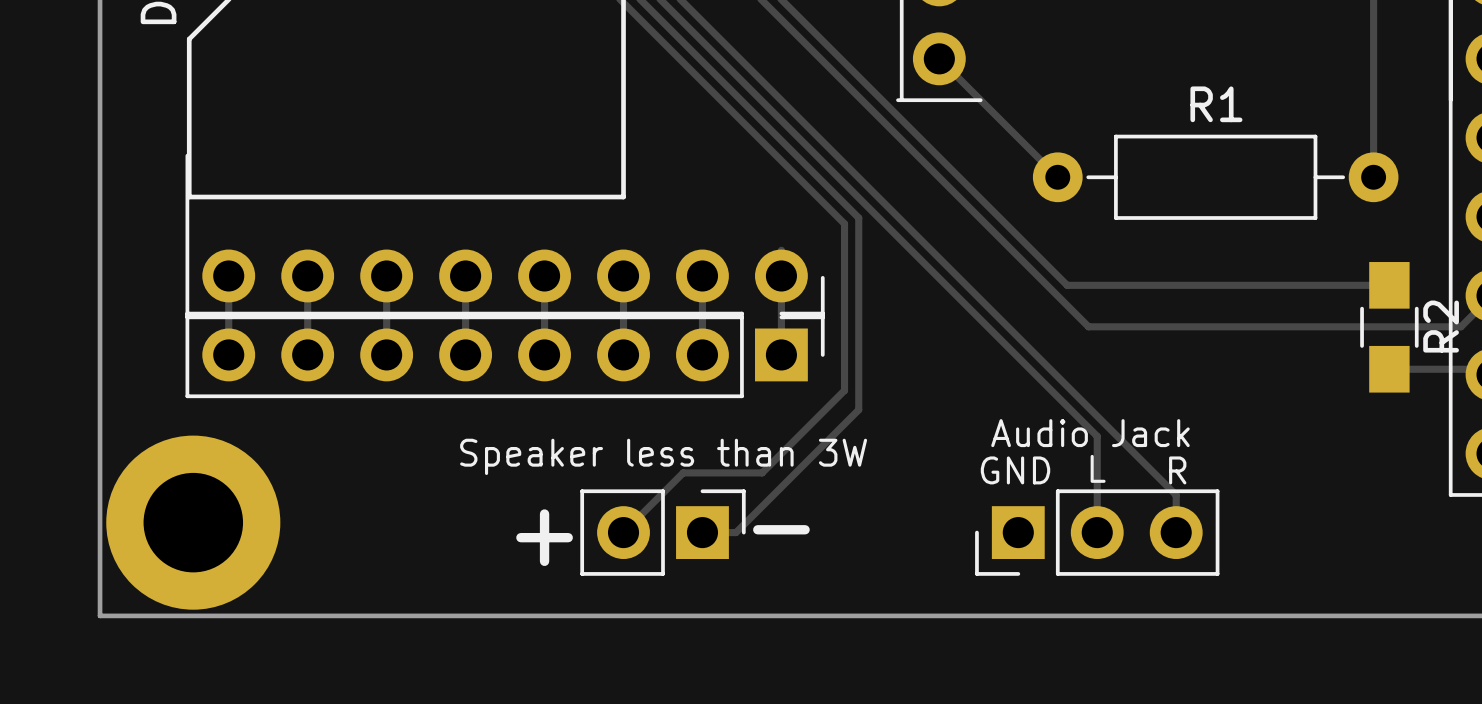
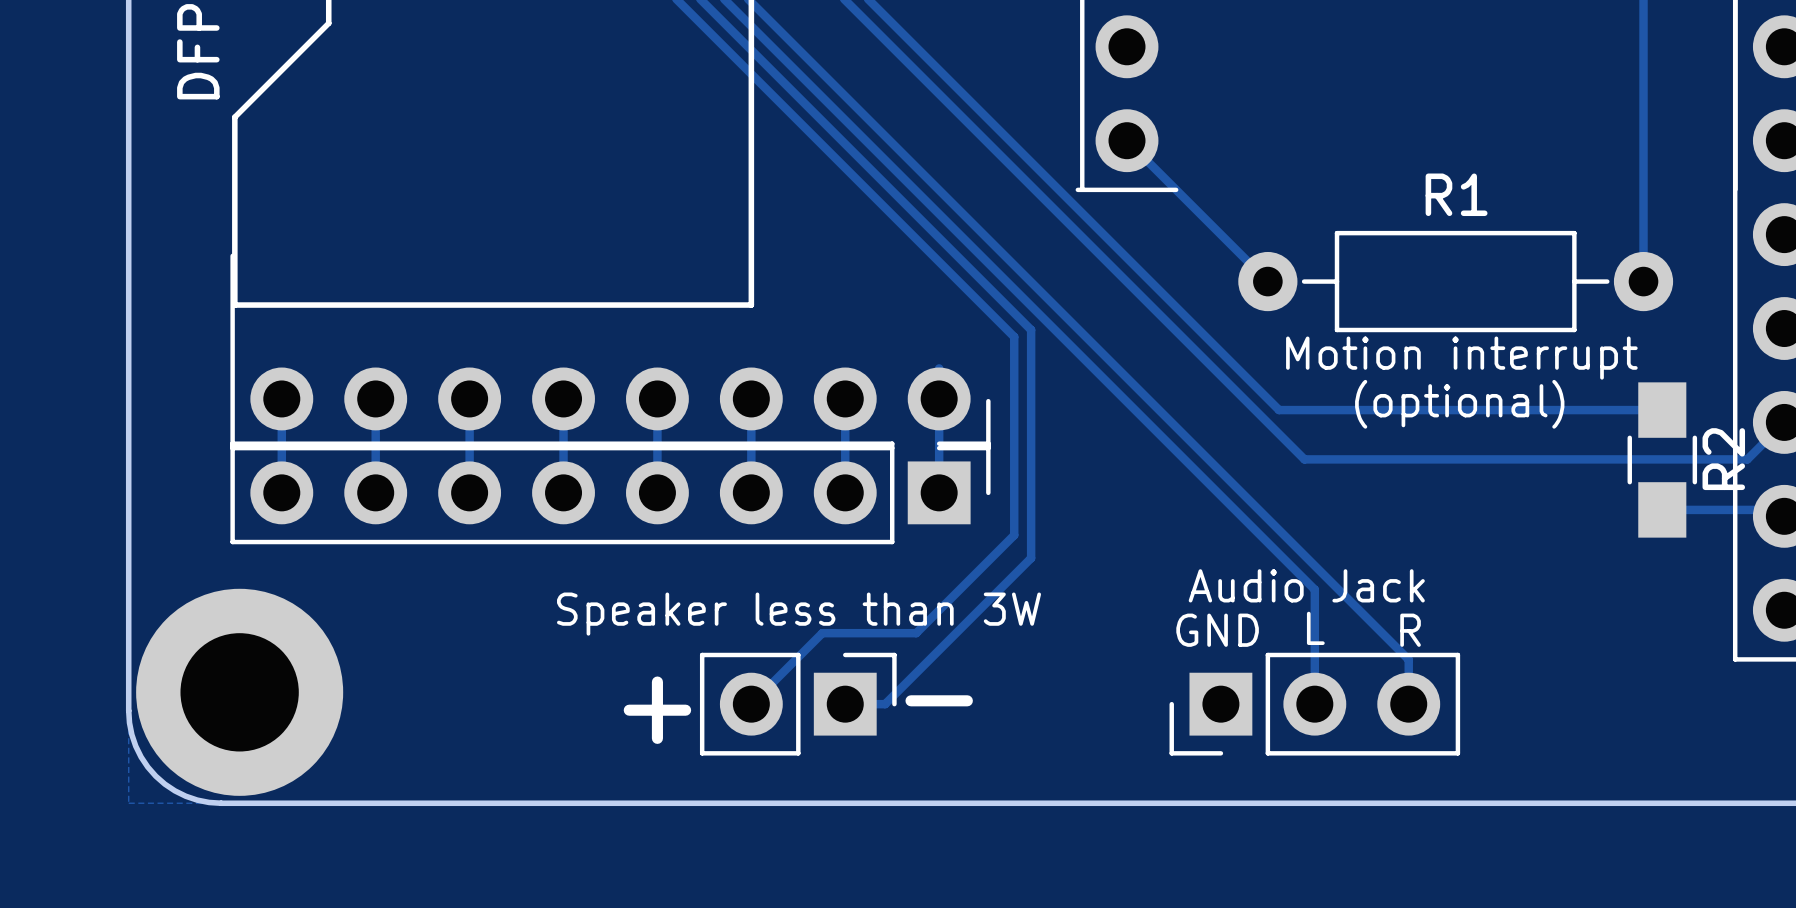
text: none -> Motion interrupt (1461, 358)
text: none -> (optional) (1459, 404)
board edge: (100, 538) (100, 615) (177, 615) -> (128, 710) (129, 722) (135, 746) (147, 767) (155, 776) (174, 790) (185, 796) (209, 802) (221, 803)

